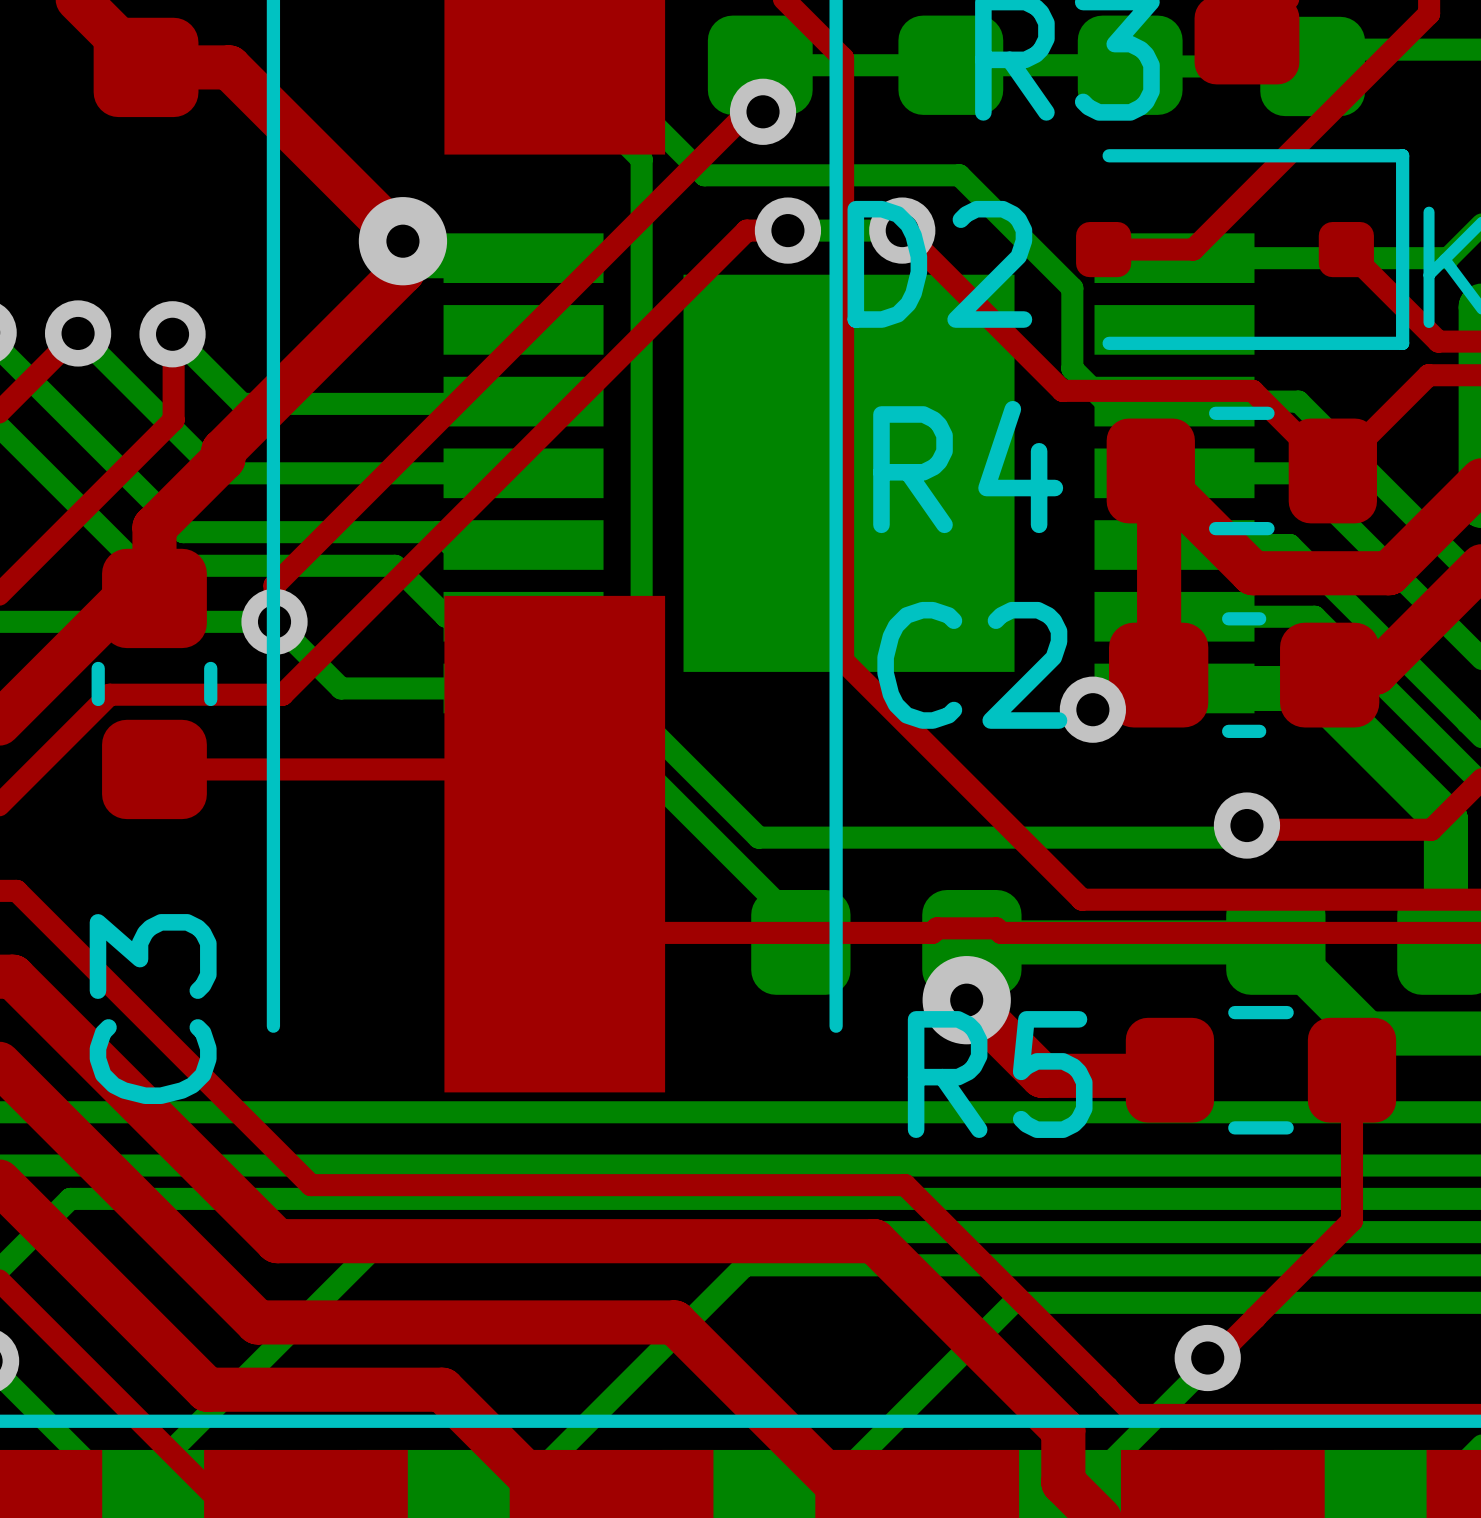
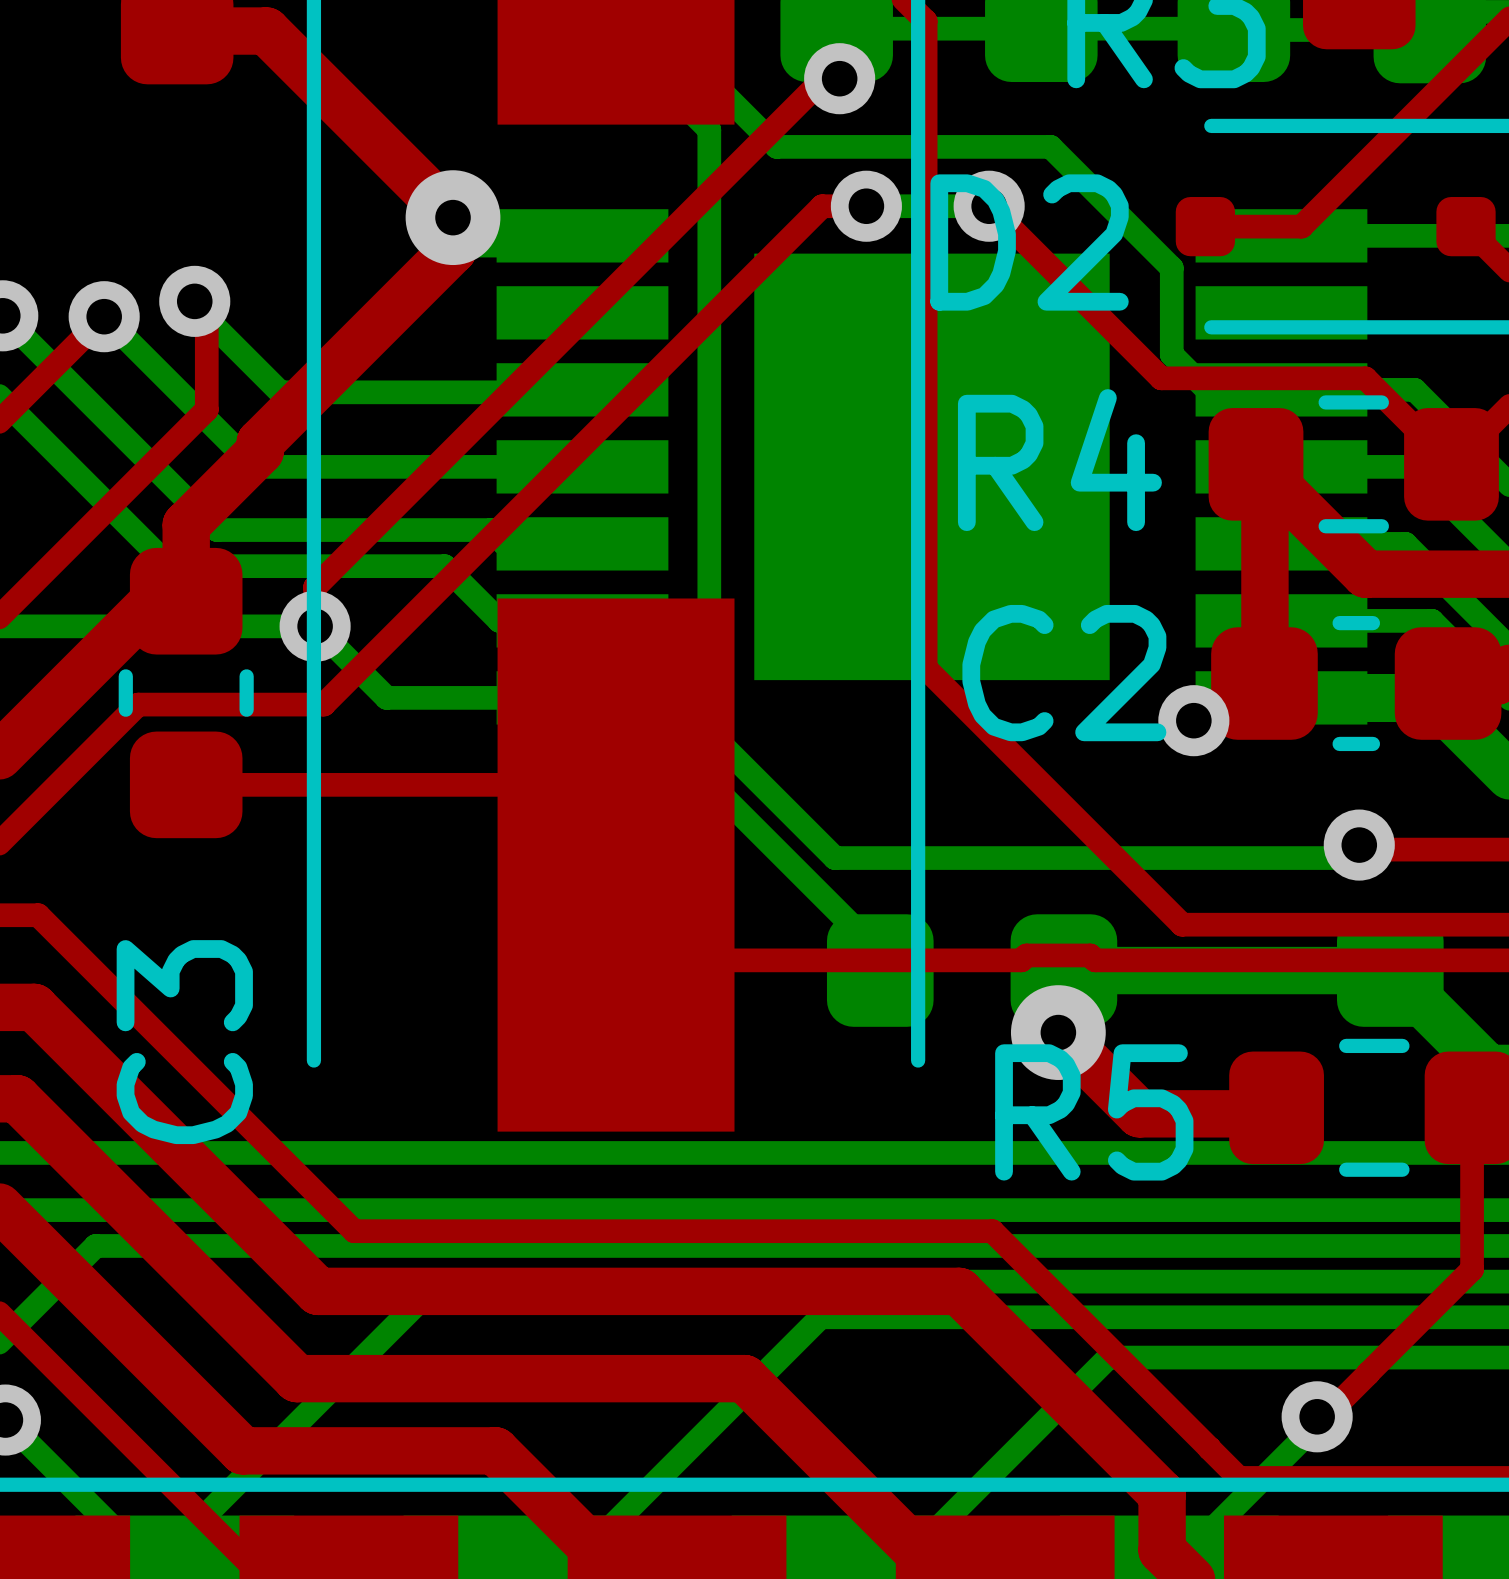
via position: (172, 334) -> (194, 301)

